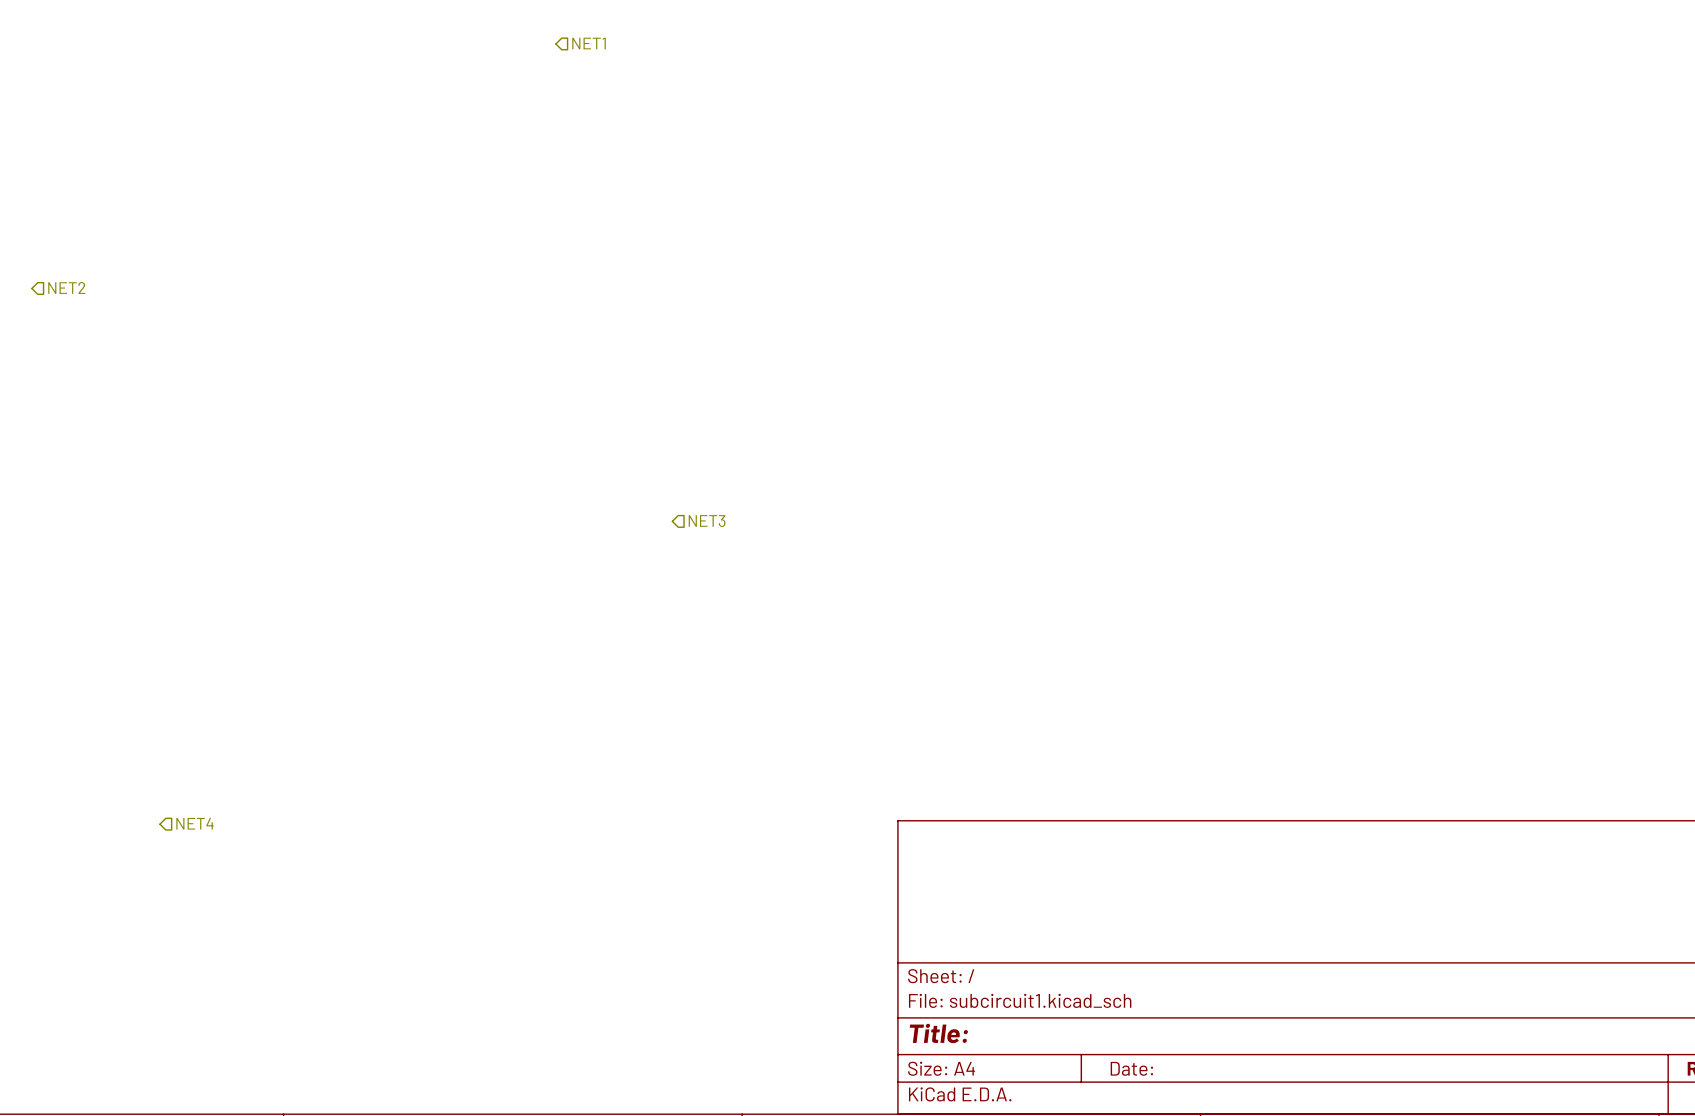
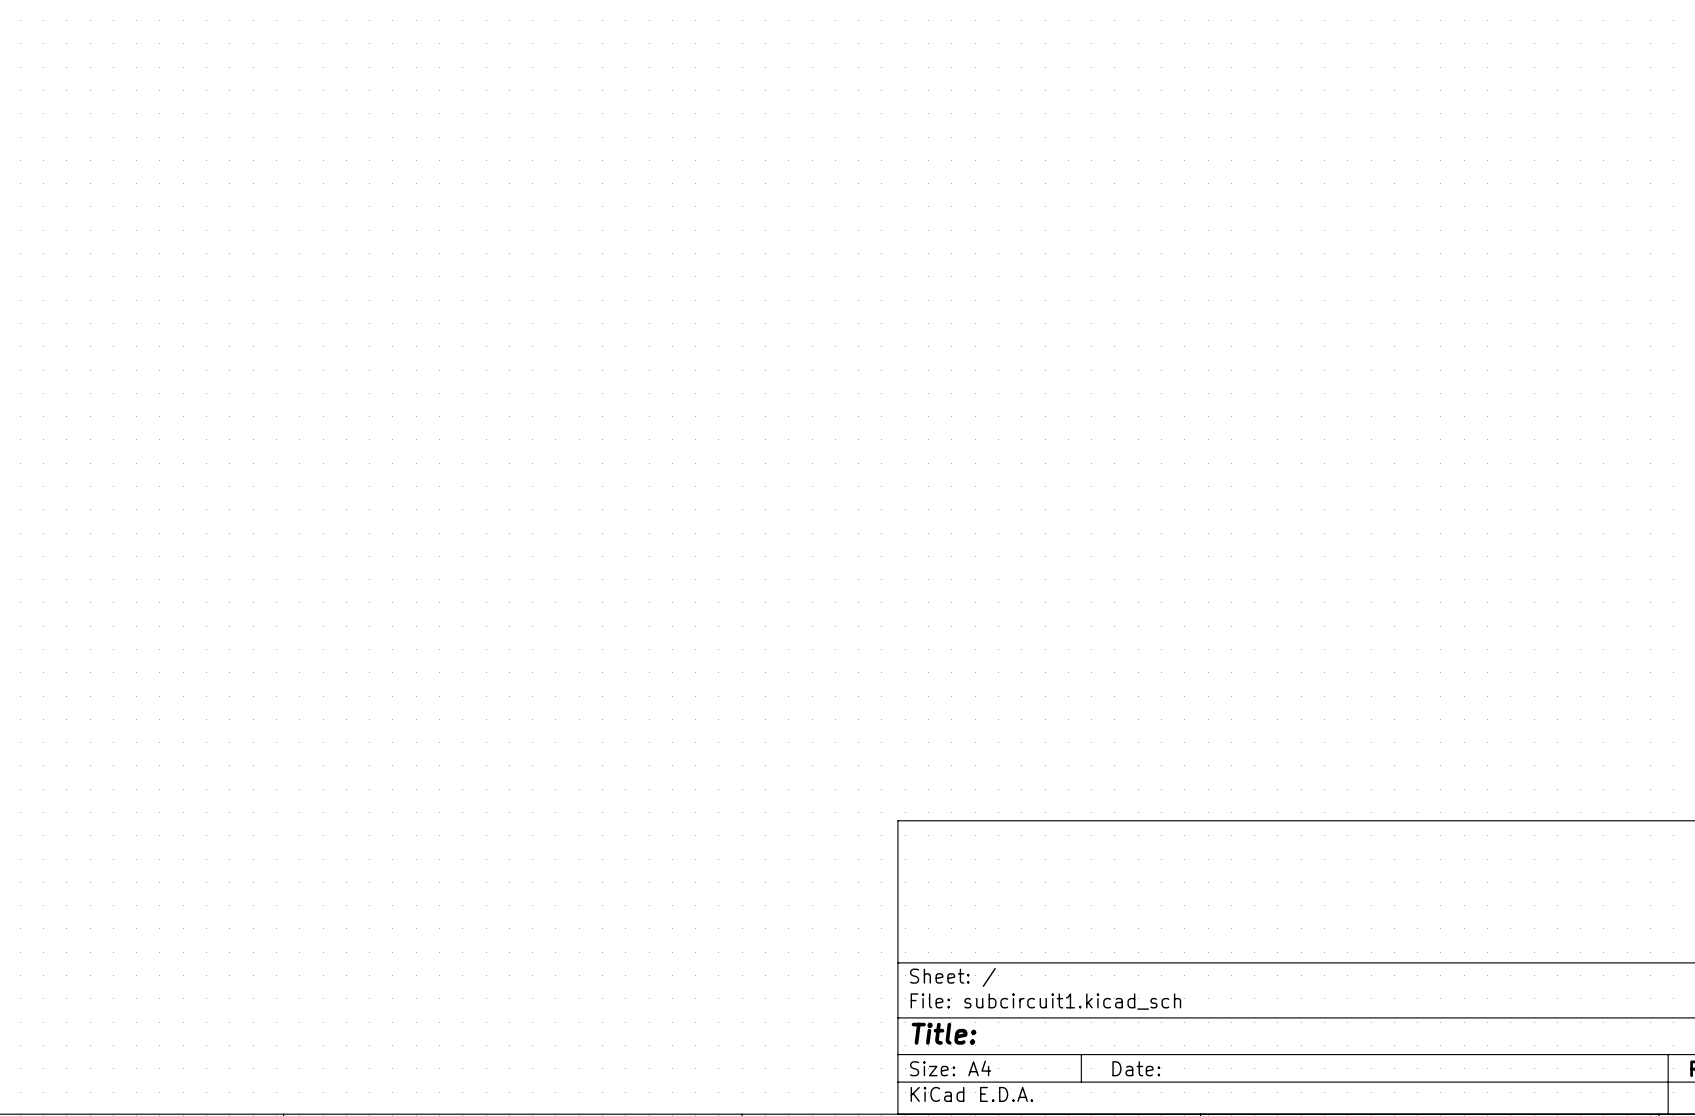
hierarchical label: NET1 (589, 43) -> none
hierarchical label: NET2 (66, 288) -> none
hierarchical label: NET3 (707, 521) -> none
hierarchical label: NET4 (195, 823) -> none

